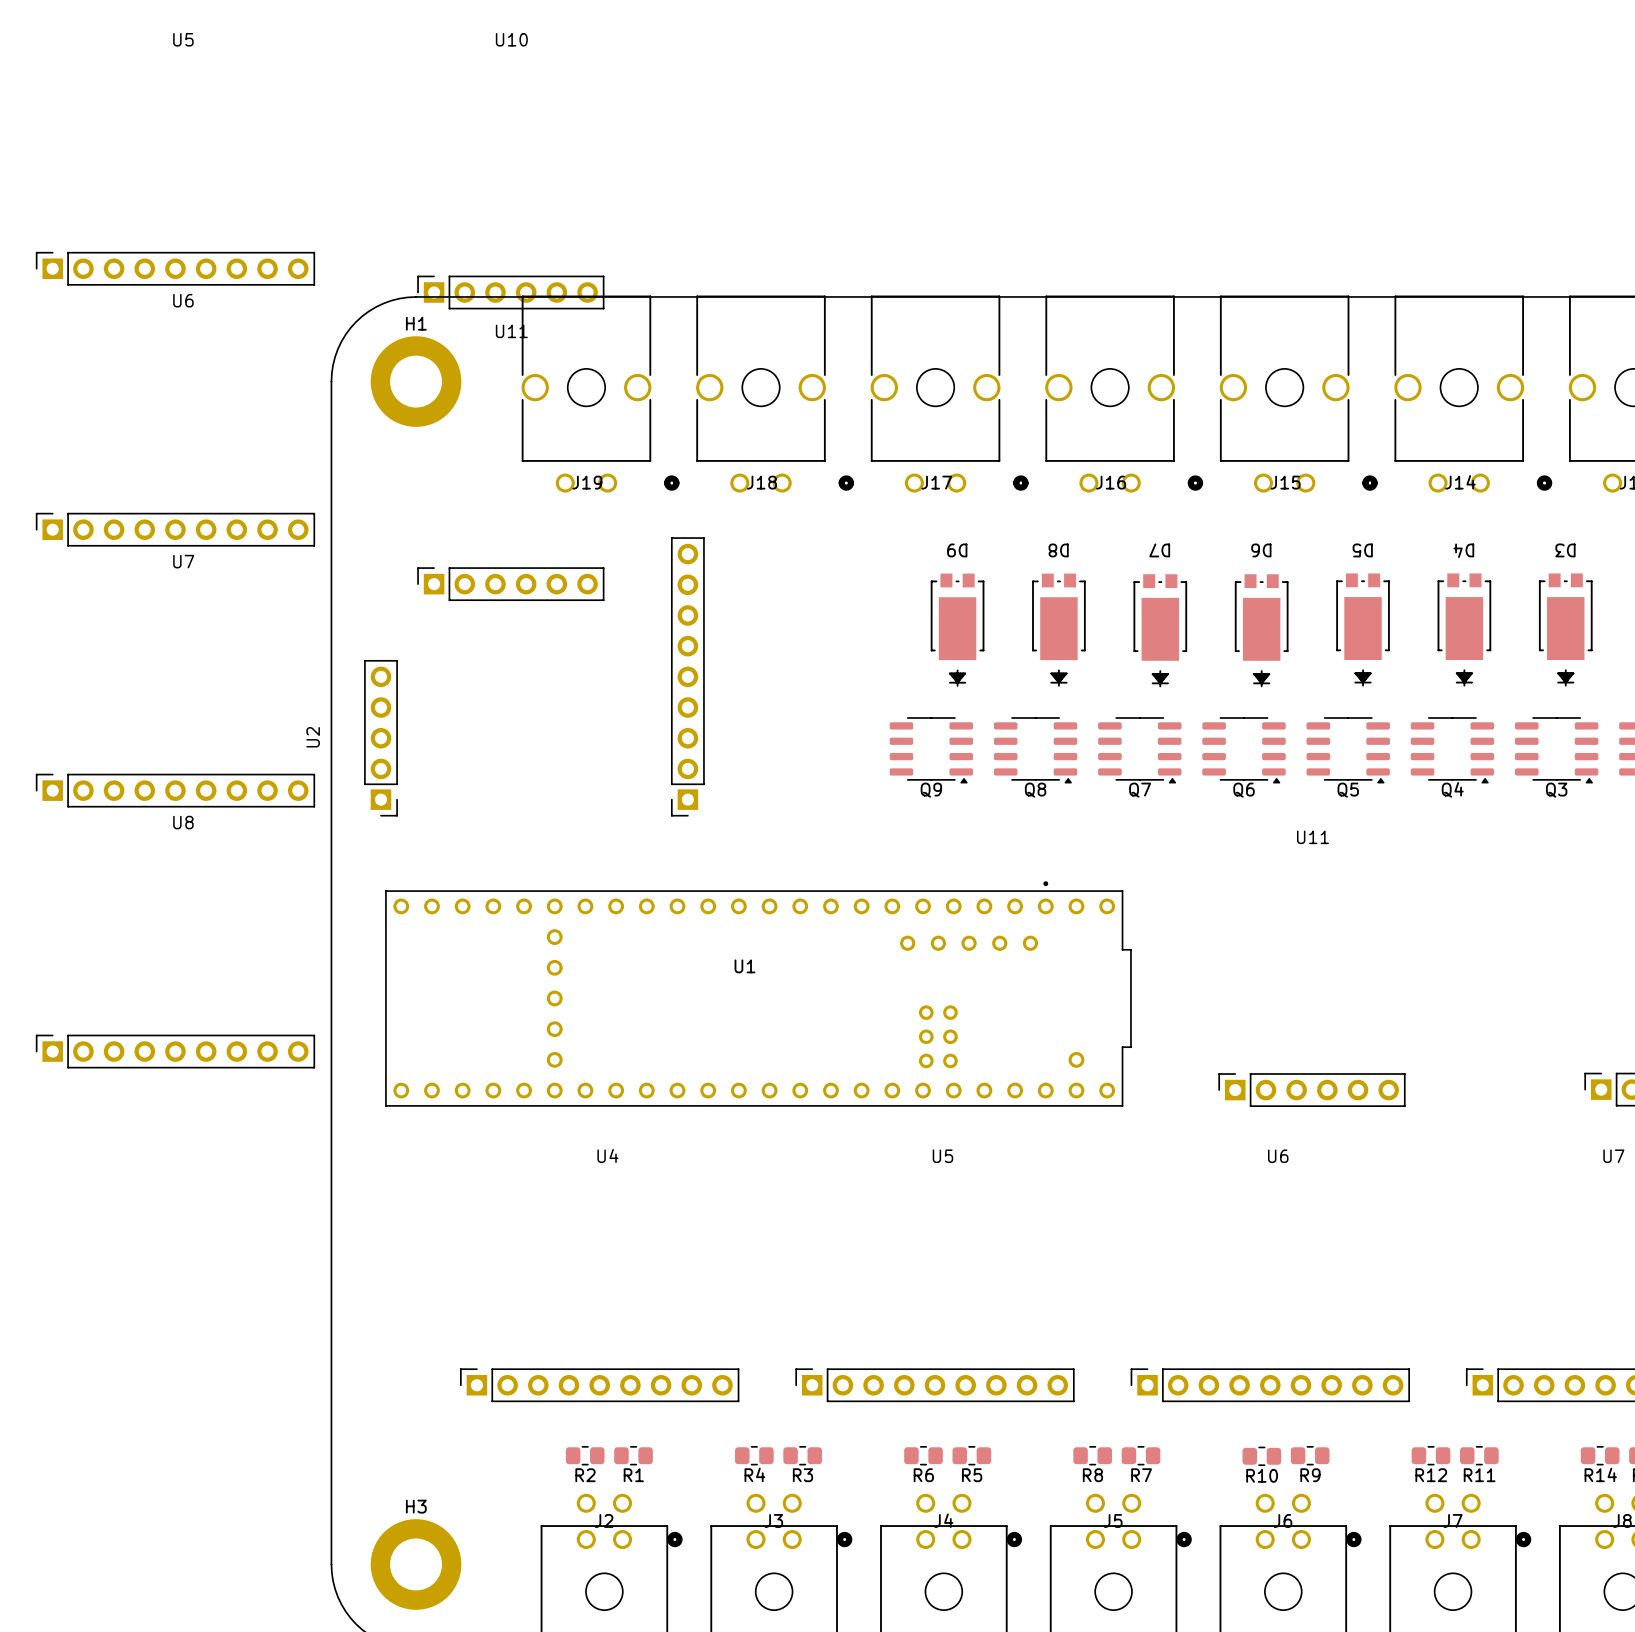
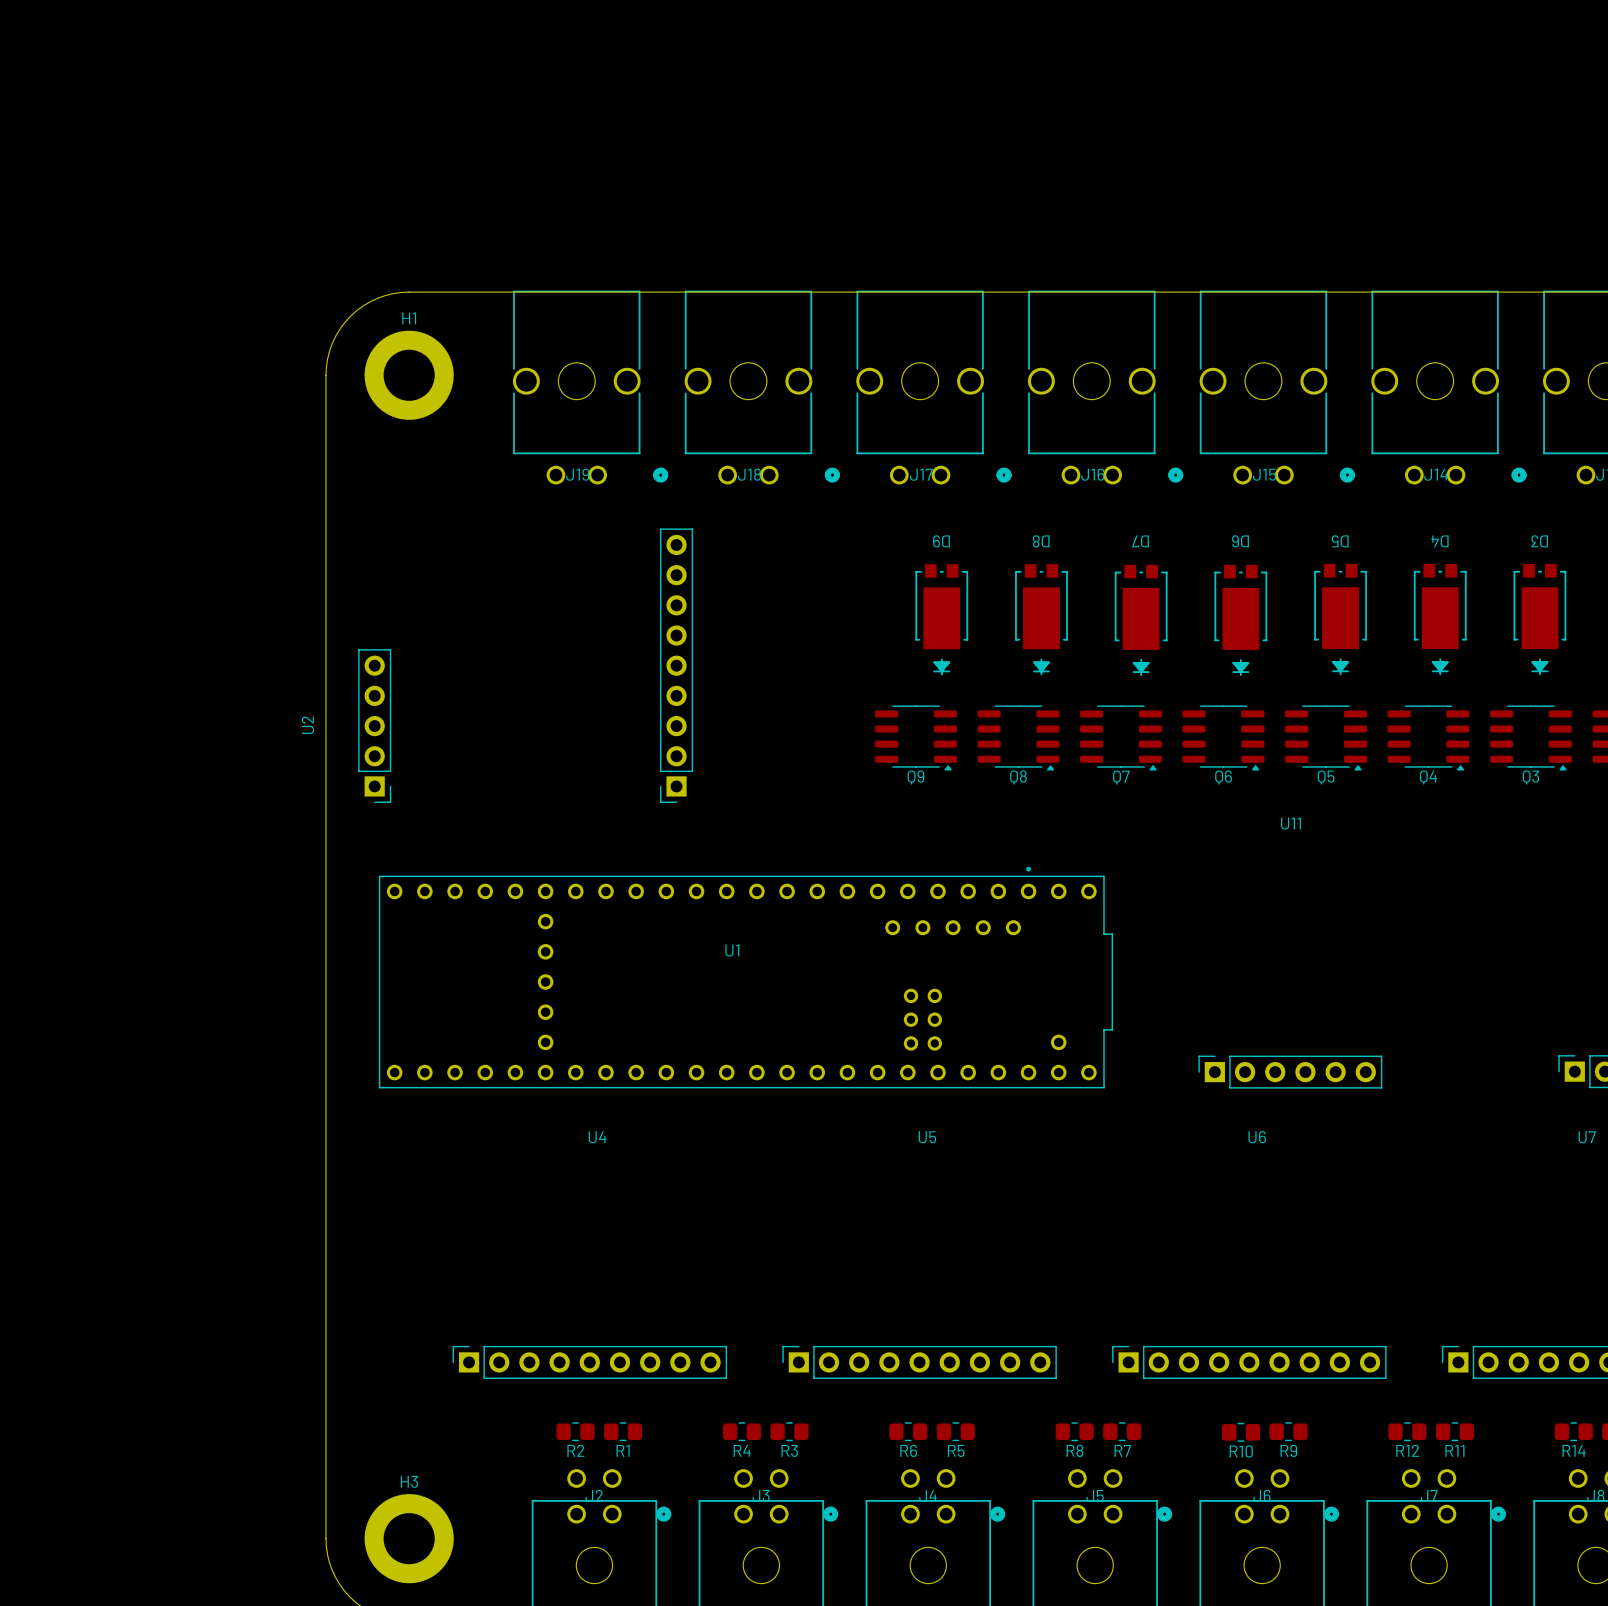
U5: (175, 268) -> none
U10: (510, 292) -> none
U6: (175, 529) -> none
U11: (510, 584) -> none
U7: (175, 790) -> none
U8: (175, 1051) -> none

